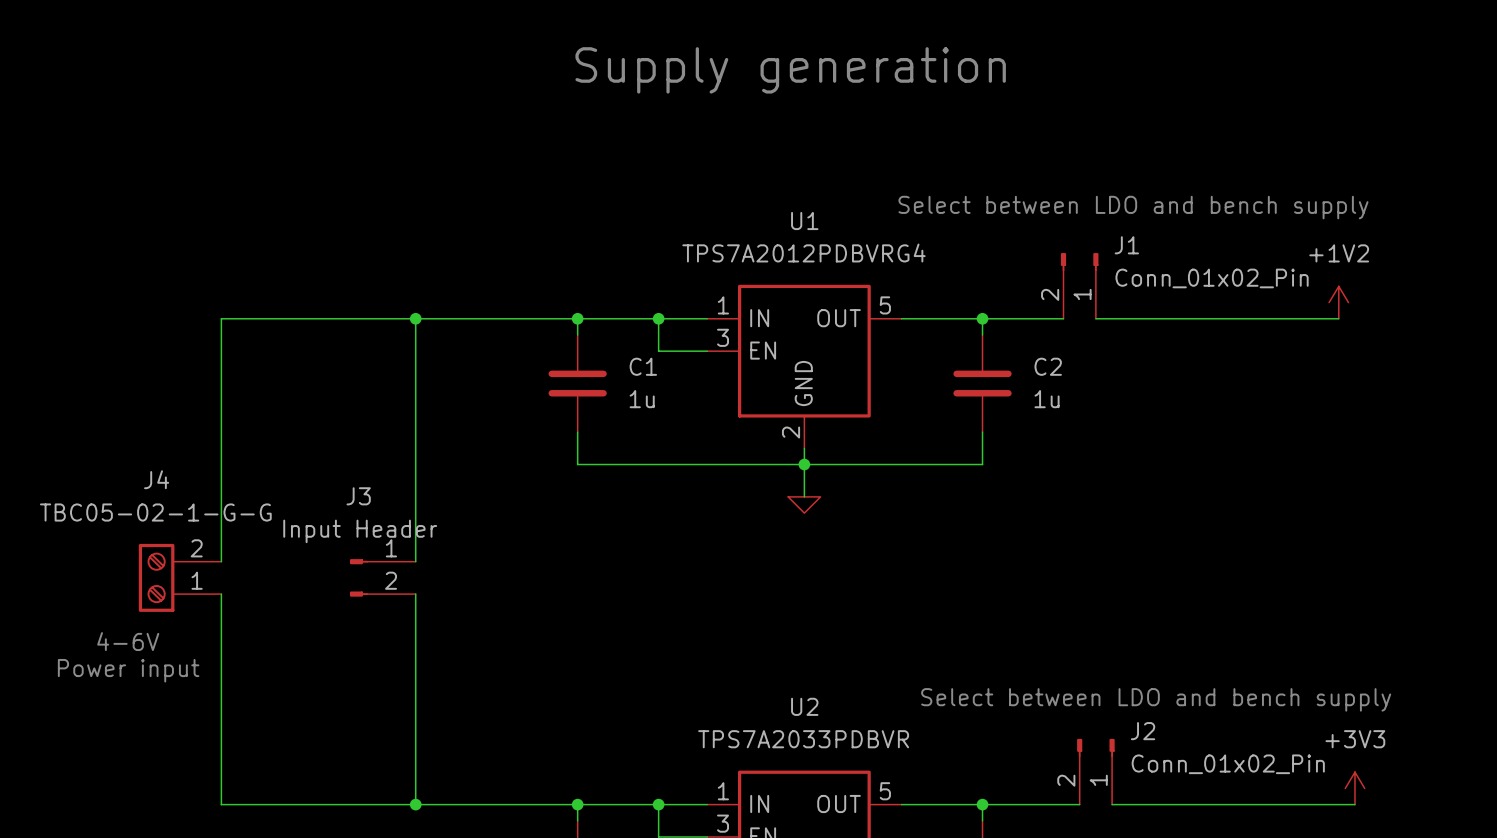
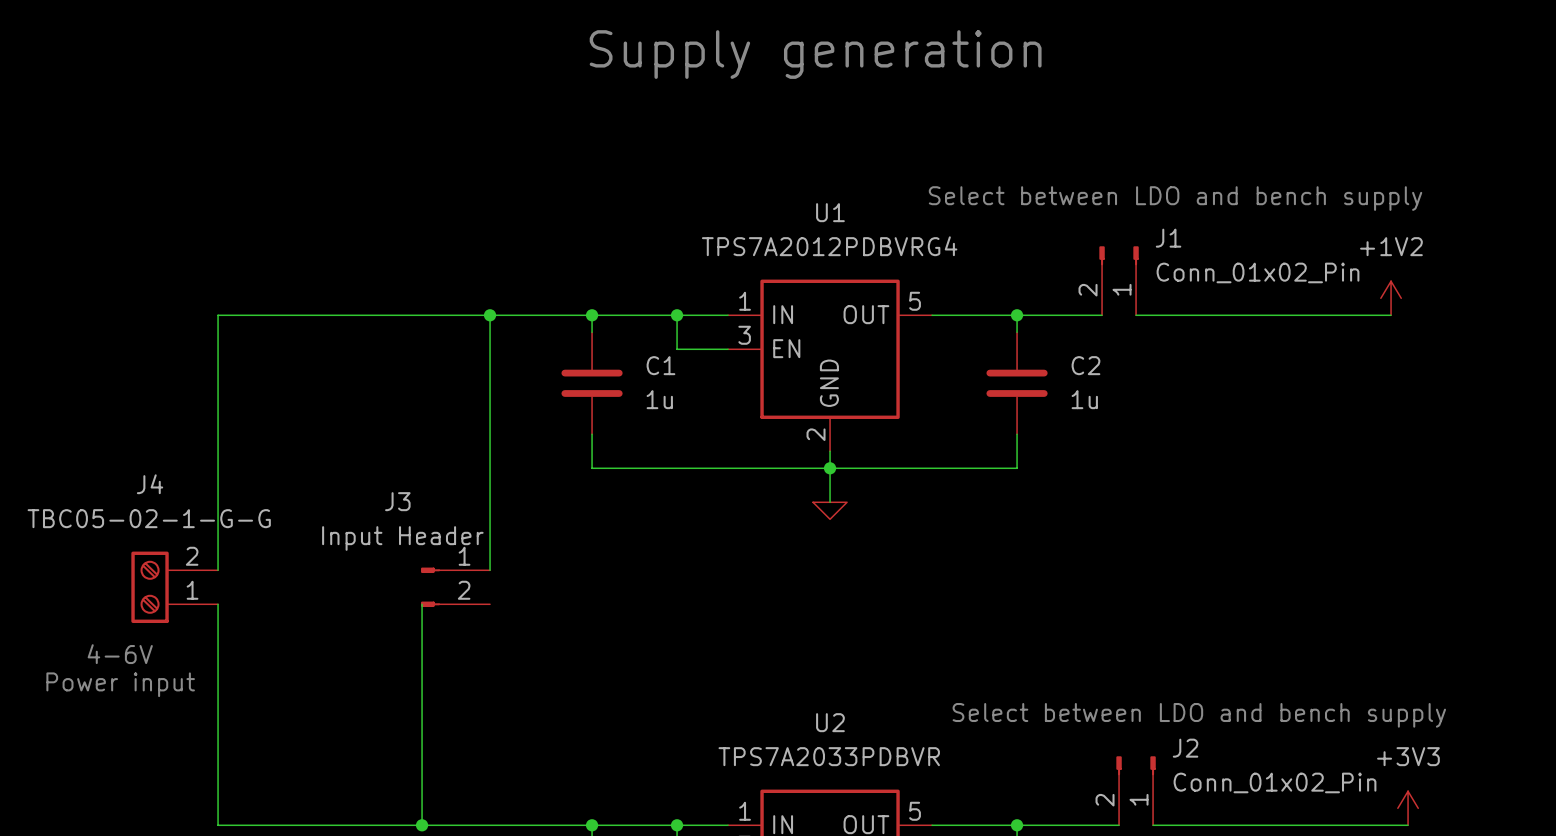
wire: (415, 318) (415, 561) -> (490, 315) (490, 570)
junction position: (415, 318) -> (490, 315)
J3 name position: J3 (358, 496) -> J3 (397, 501)
J3 value position: Input Header (360, 531) -> Input Header (402, 538)
J3 position: (382, 577) -> (455, 587)

